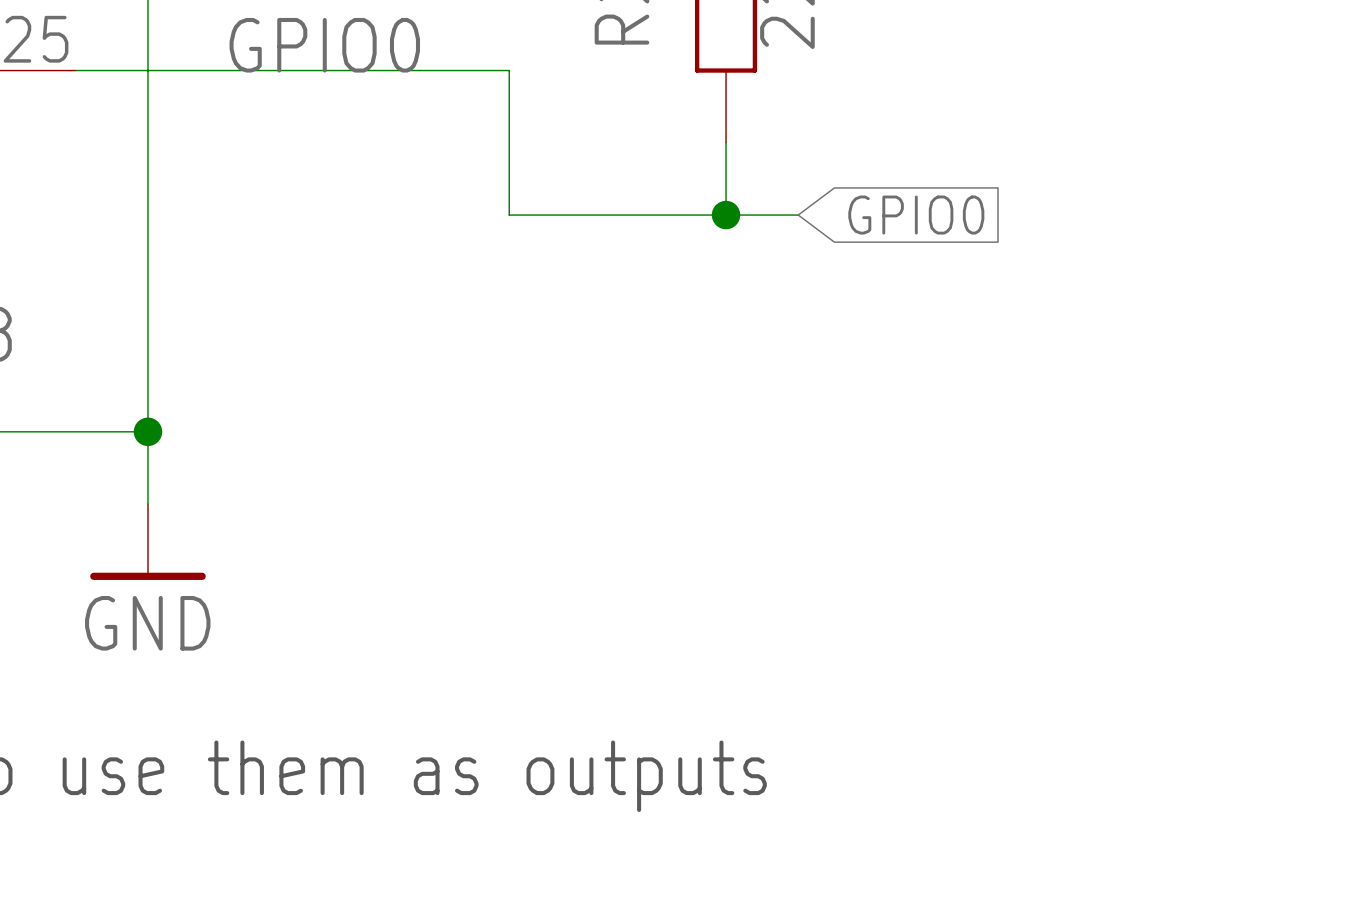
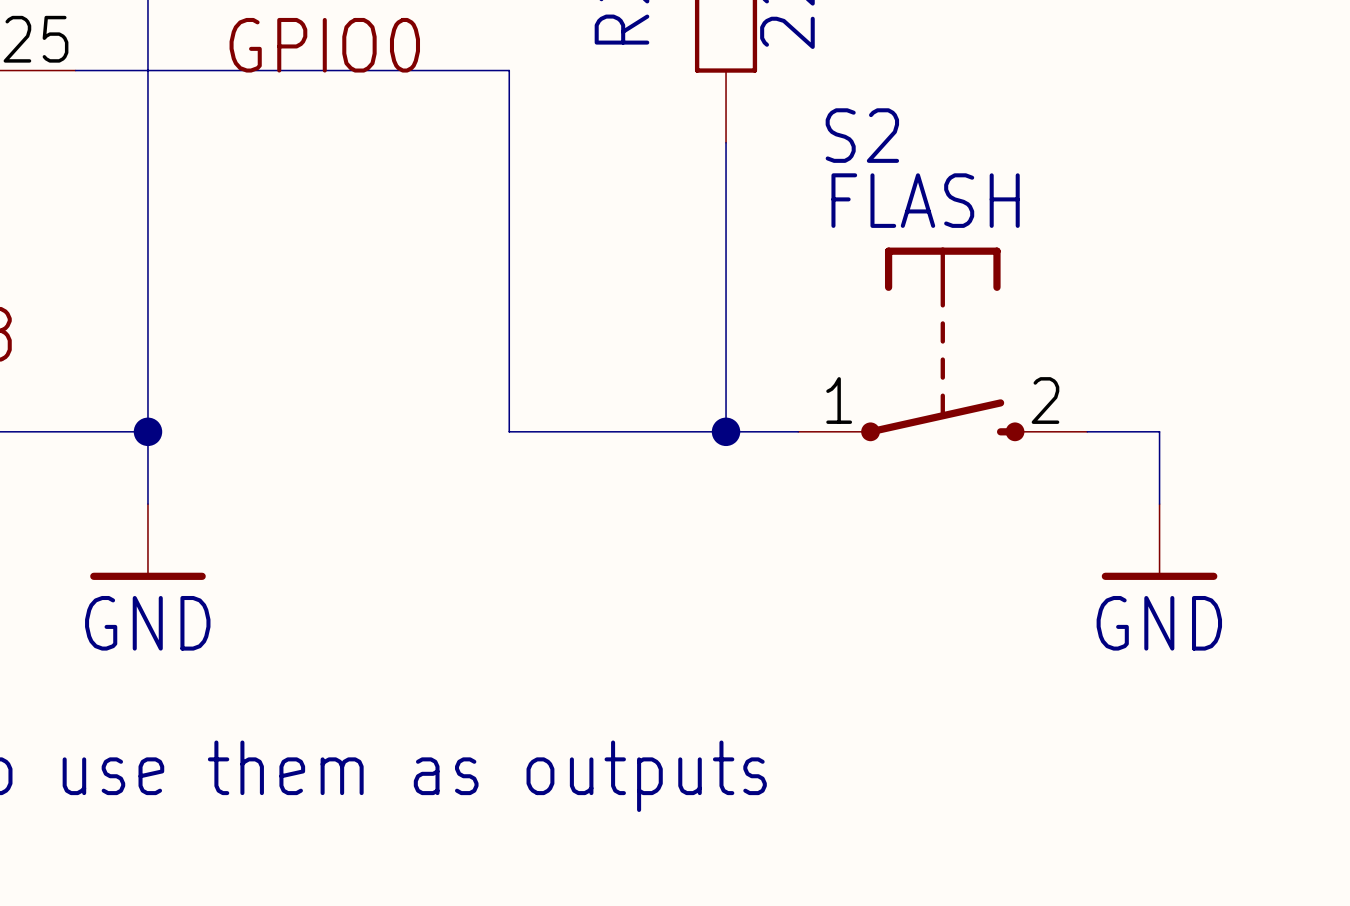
wire: (509, 215) (798, 215) -> (509, 215) (509, 431) (798, 431)
wire: none -> (726, 215) (726, 431)
junction: (726, 215) -> none
global label: GPIO0 (916, 215) -> none
S2: none -> FLASH (942, 344)
junction: none -> (726, 431)
wire: none -> (1087, 431) (1159, 431) (1159, 504)
power symbol: none -> GND (1159, 542)

